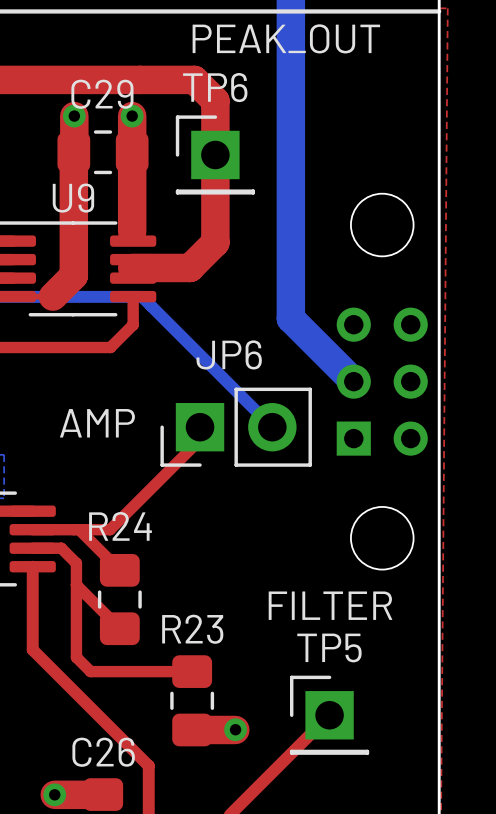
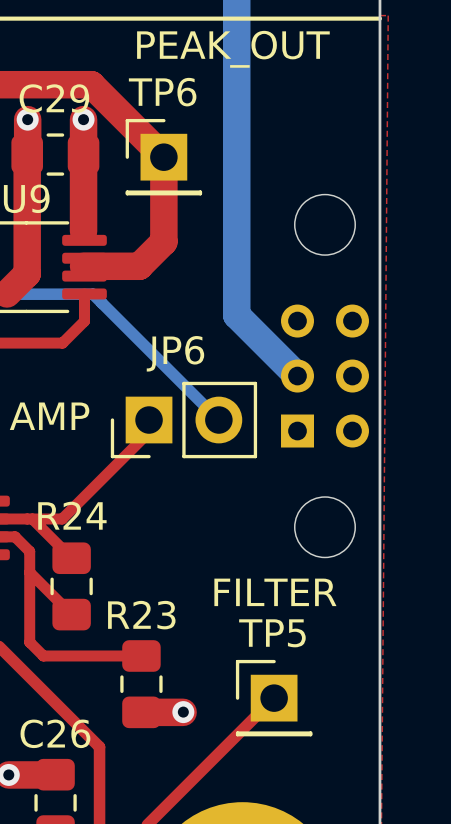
top track: (140, 79) (194, 79) (215, 100) (215, 154) -> (91, 84) (163, 157)

